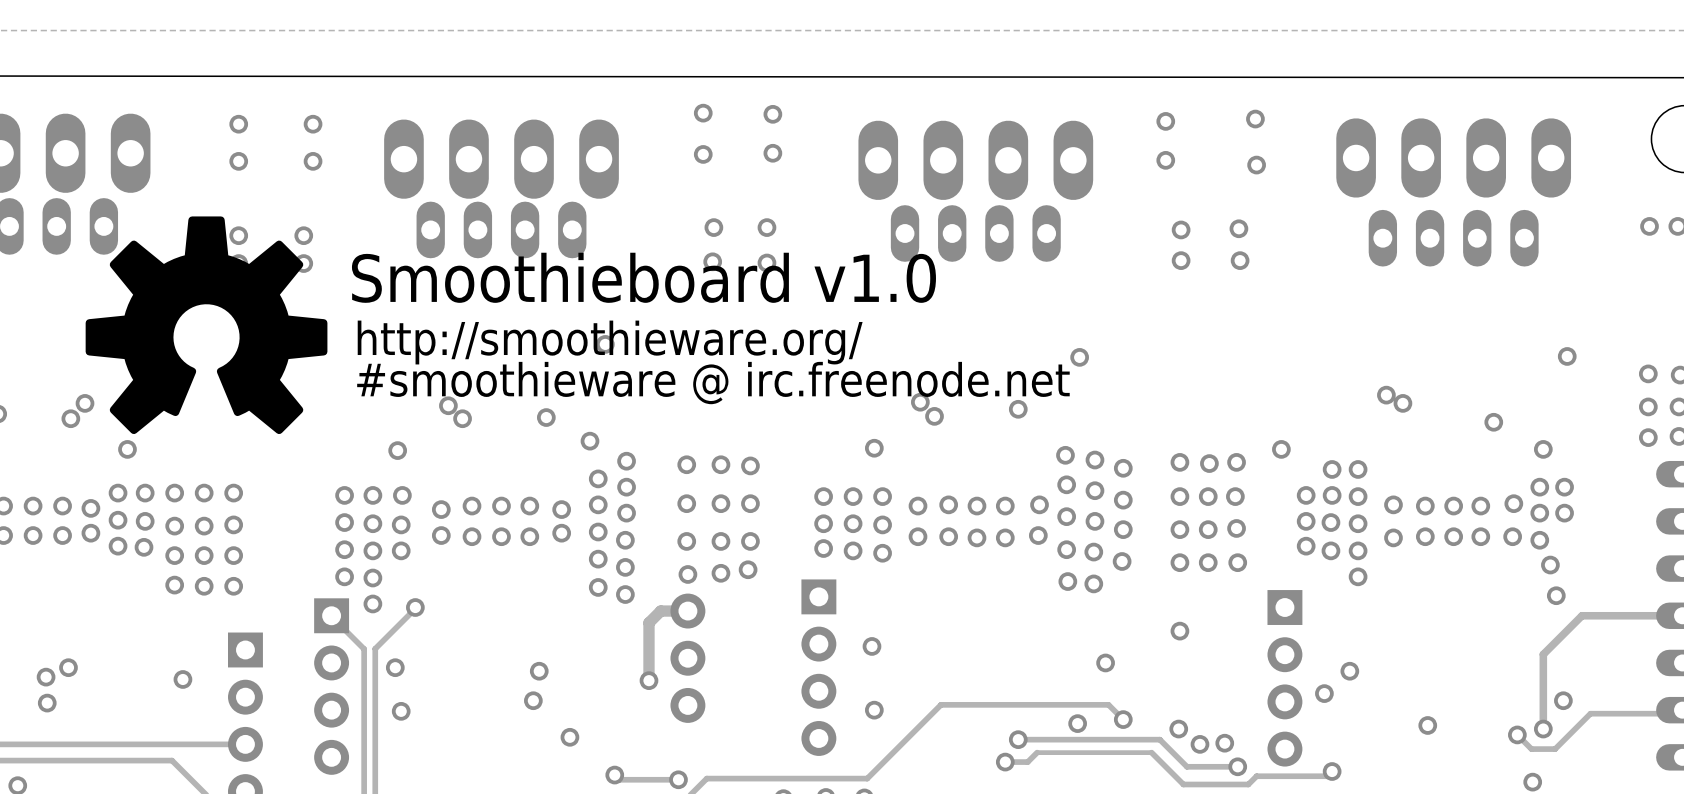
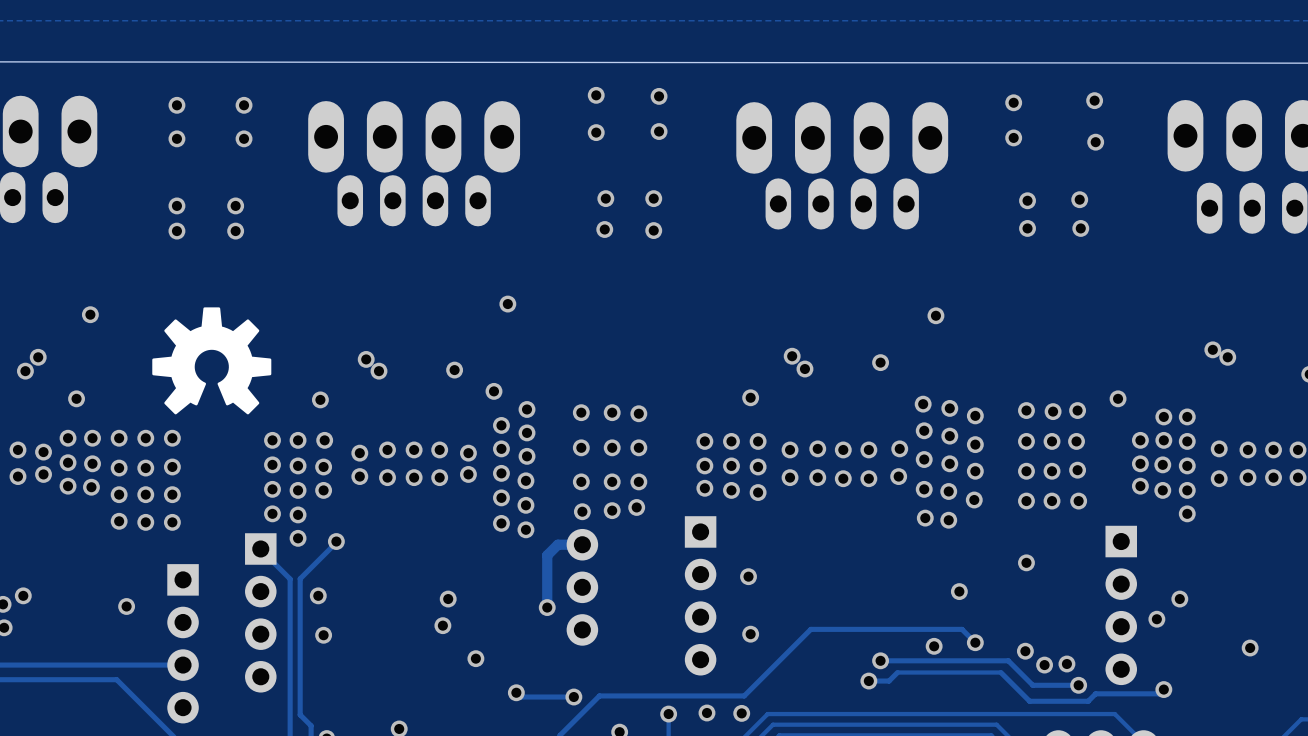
drawing: [85, 216, 328, 435] -> none
text: Smoothieboard v1.0 (643, 277) -> none
text: http://smoothieware.org/ (610, 342) -> none
drawing: none -> [152, 307, 272, 415]
text: #smoothieware @ irc.freenode.net (713, 383) -> none

